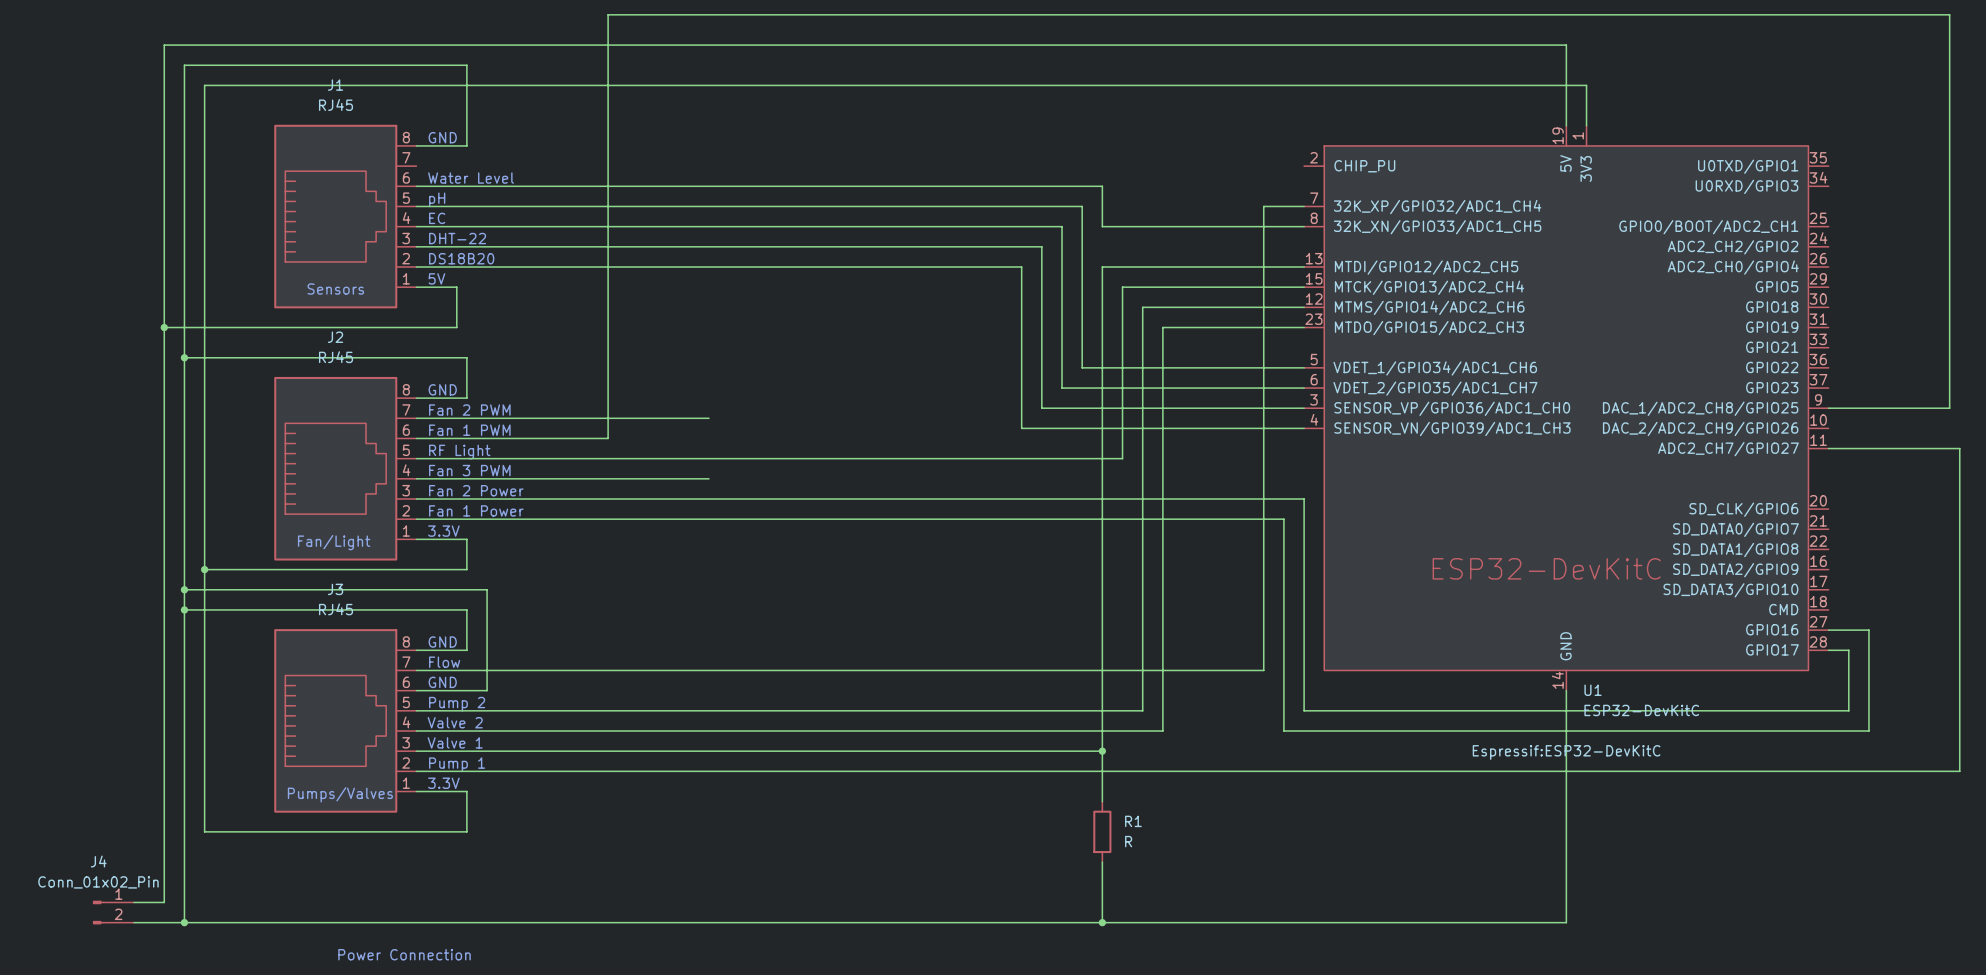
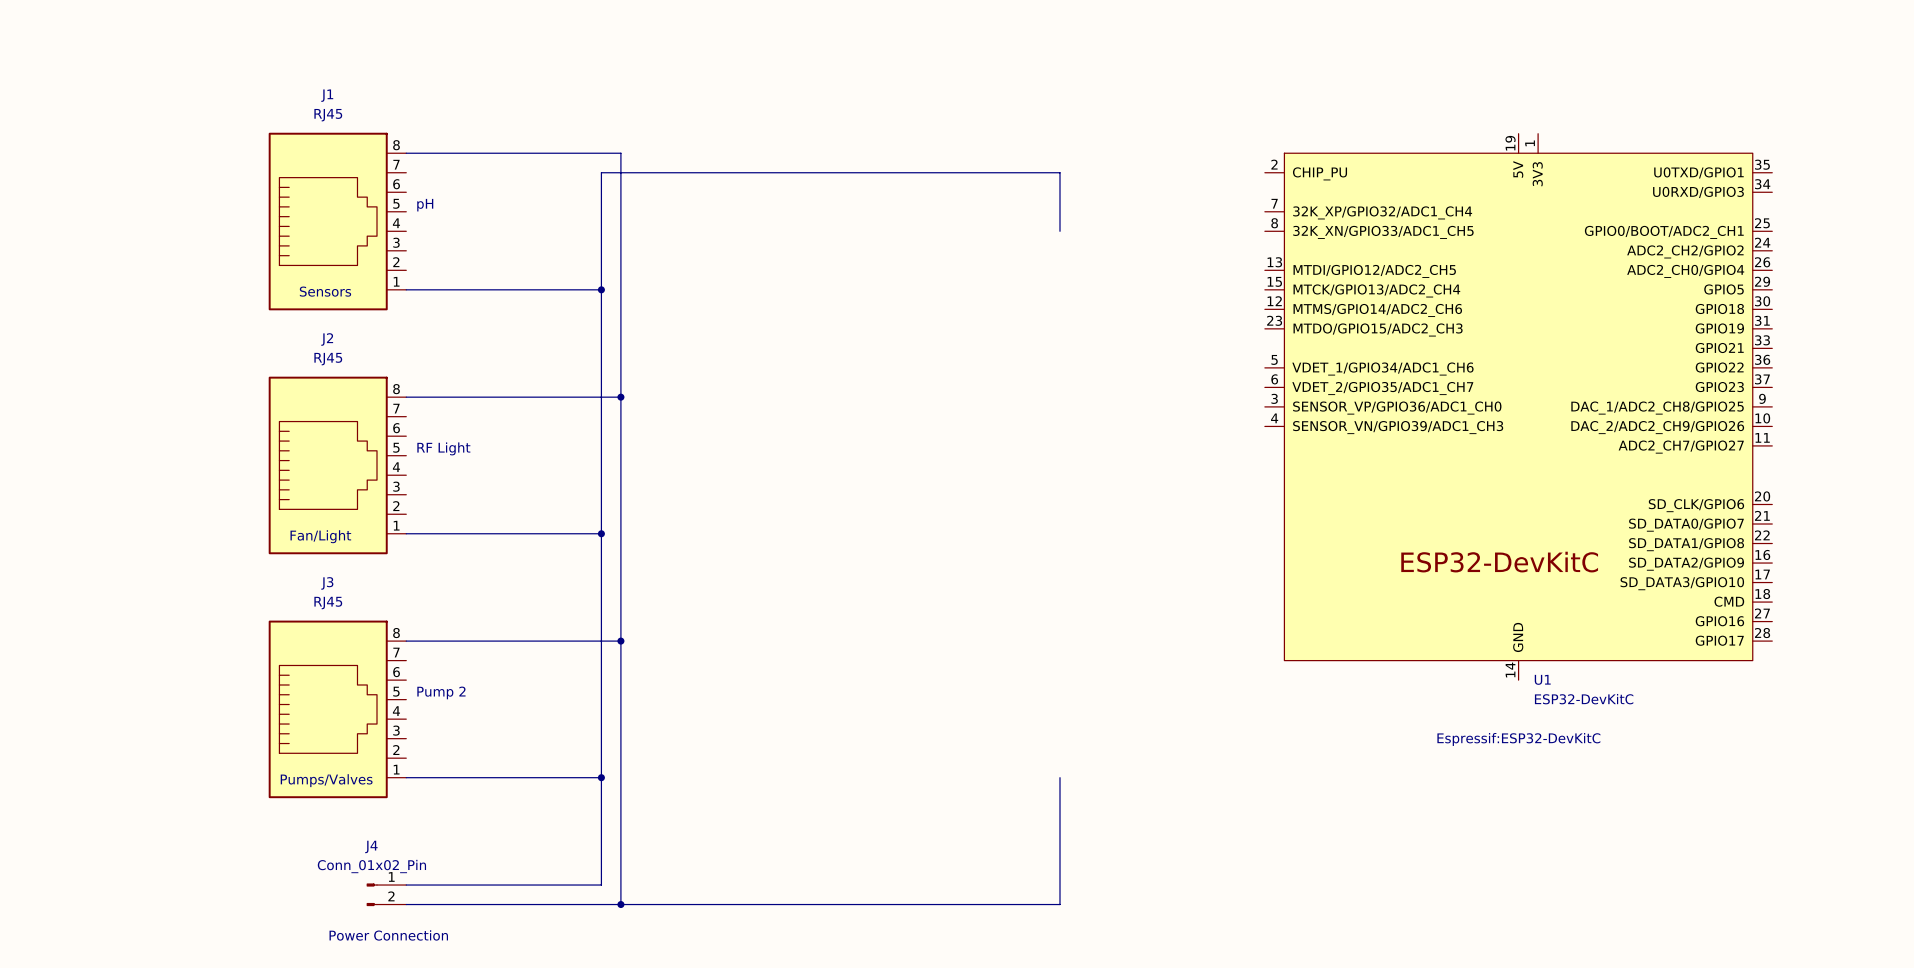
wire: (1566, 125) (1566, 45) (164, 45) (164, 902) (134, 902) -> none
wire: (1586, 125) (1586, 85) (204, 85) (204, 831) (466, 831) (466, 791) -> (601, 777) (455, 777)
text: GND (442, 137) -> none
wire: (466, 145) (466, 65) (184, 65) (184, 922) -> (455, 153) (620, 153) (620, 904)
text: Water Level (471, 178) -> none
wire: (416, 186) (1102, 186) (1102, 226) (1304, 226) -> none
wire: (416, 206) (1082, 206) (1082, 367) (1304, 367) -> none
wire: (1304, 206) (1263, 206) (1263, 670) (416, 670) -> none
text: EC (437, 218) -> none
wire: (416, 226) (1062, 226) (1062, 388) (1304, 388) -> none
wire: none -> (1059, 231) (1059, 172) (601, 172) (601, 885) (406, 885)
text: DHT-22 (457, 238) -> none
wire: (416, 246) (1041, 246) (1041, 408) (1304, 408) -> none
text: DS18B20 (461, 258) -> none
wire: (416, 266) (1021, 266) (1021, 428) (1304, 428) -> none
wire: (1304, 266) (1102, 266) (1102, 801) -> none
text: 5V (436, 278) -> none
wire: (456, 287) (456, 327) (164, 327) -> (445, 289) (601, 289)
junction: none -> (601, 289)
wire: (1304, 287) (1122, 287) (1122, 458) (416, 458) -> none
wire: (1304, 307) (1142, 307) (1142, 710) (416, 710) -> none
junction: (164, 327) -> none
wire: (1304, 327) (1162, 327) (1162, 730) (416, 730) -> none
wire: (184, 357) (466, 357) (466, 398) -> (620, 397) (455, 397)
junction: (184, 357) -> none
text: GND (442, 389) -> none
junction: none -> (620, 397)
wire: (1828, 408) (1949, 408) (1949, 14) (608, 14) (608, 438) (416, 438) -> none
text: Fan 2 PWM (469, 410) -> none
wire: (416, 418) (708, 418) -> none
text: Fan 1 PWM (469, 430) -> none
wire: (1828, 448) (1959, 448) (1959, 771) (416, 771) -> none
text: Fan 3 PWM (469, 470) -> none
wire: (416, 478) (708, 478) -> none
text: Fan 2 Power (476, 490) -> none
wire: (416, 498) (1304, 498) (1304, 710) (1848, 710) (1848, 650) (1828, 650) -> none
text: Fan 1 Power (476, 510) -> none
wire: (416, 519) (1283, 519) (1283, 730) (1868, 730) (1868, 630) (1828, 630) -> none
text: 3.3V (443, 531) -> none
wire: (466, 539) (466, 569) (204, 569) -> (455, 533) (601, 533)
junction: none -> (601, 533)
junction: (204, 569) -> none
wire: (184, 589) (487, 589) (487, 690) (416, 690) -> none
junction: (184, 589) -> none
wire: (184, 609) (466, 609) (466, 650) -> (620, 641) (455, 641)
junction: (184, 609) -> none
text: GND (442, 642) -> none
junction: none -> (620, 641)
text: Flow (444, 662) -> none
text: GND (442, 682) -> none
wire: (1566, 690) (1566, 922) (1092, 922) -> (1059, 777) (1059, 904)
text: Valve 2 (455, 722) -> none
text: Valve 1 (455, 742) -> none
wire: (416, 751) (1102, 751) -> none
junction: (1102, 751) -> none
text: Pump 1 (457, 764) -> none
text: 3.3V (443, 783) -> none
junction: none -> (601, 777)
R1: R (1102, 831) -> none
wire: (1102, 862) (1102, 922) -> none
J4 position: (113, 912) -> (386, 894)
wire: (134, 922) (416, 922) -> none
junction: (184, 922) -> none
junction: none -> (620, 904)
junction: (1102, 922) -> none

